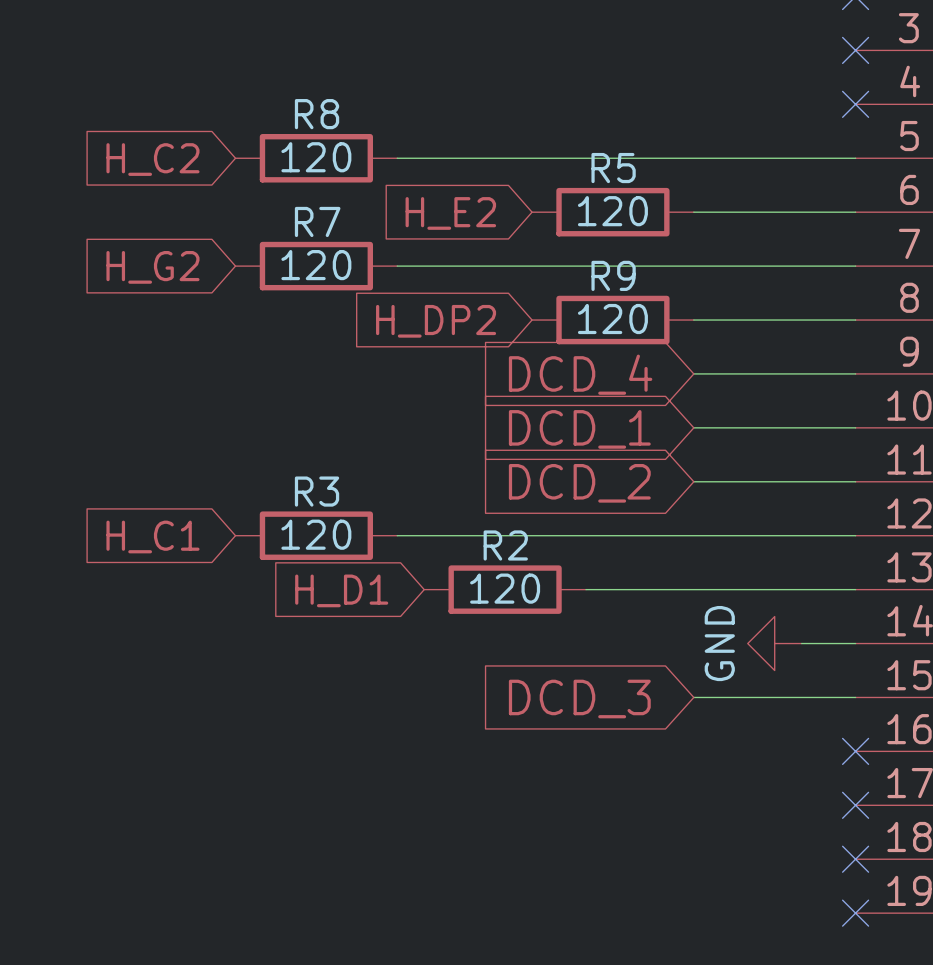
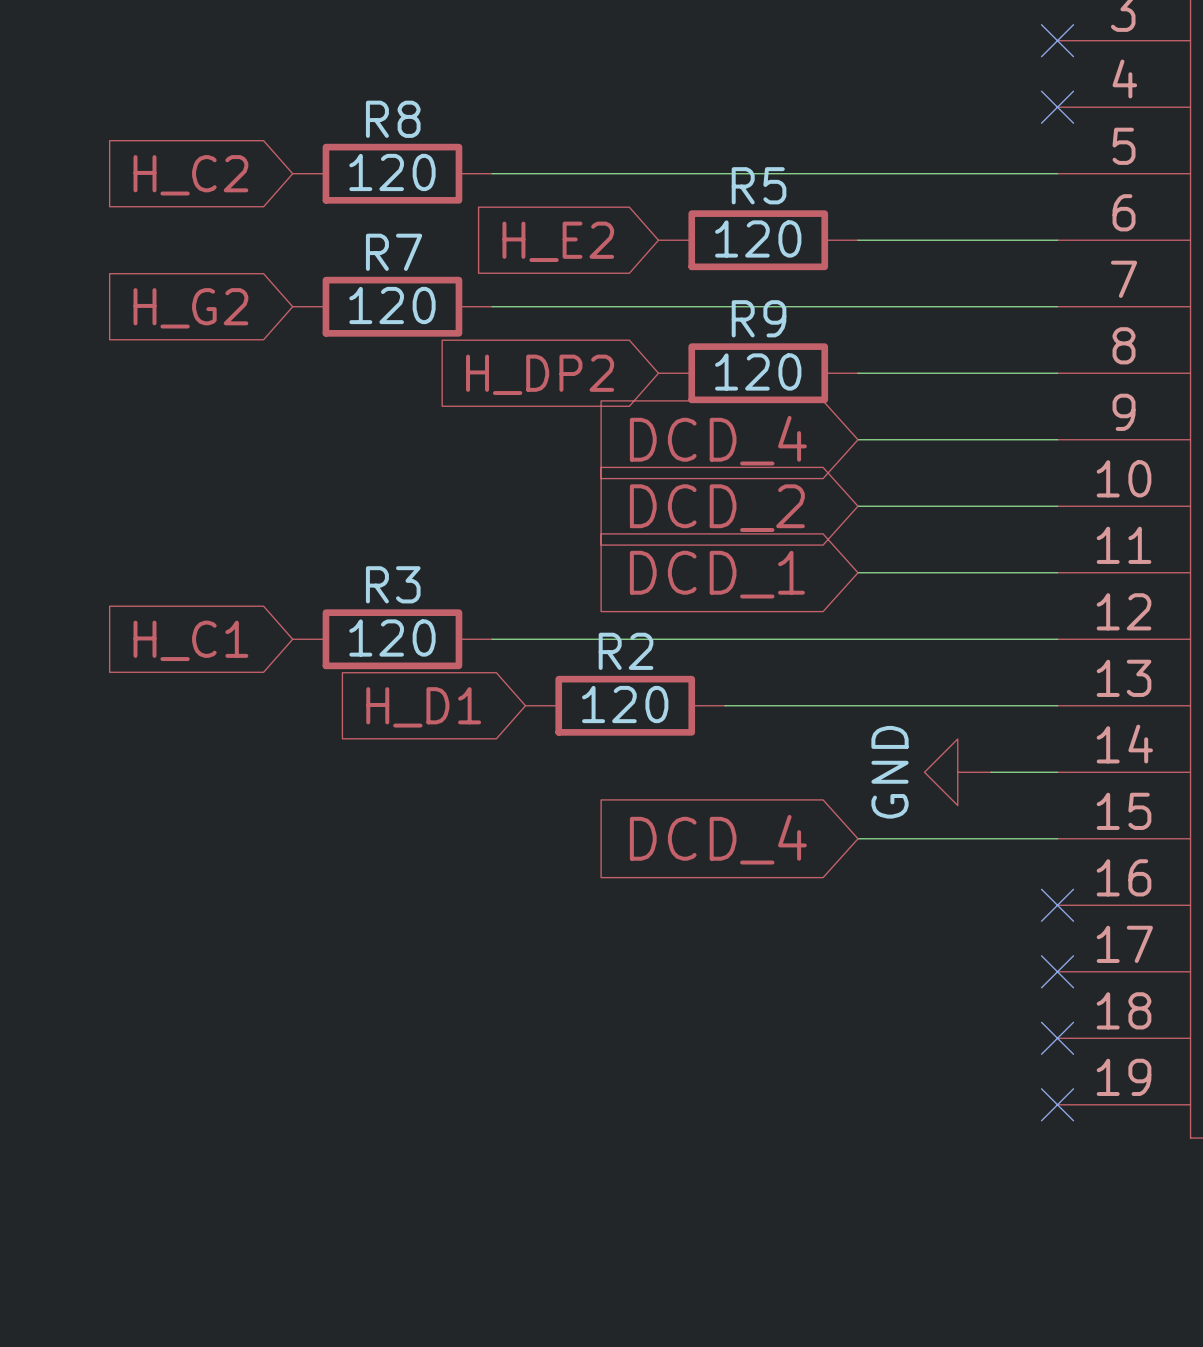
global label: DCD_1 (579, 429) -> DCD_2 (717, 508)
global label: DCD_2 (579, 483) -> DCD_1 (717, 574)
global label: DCD_3 (579, 699) -> DCD_4 (718, 839)

